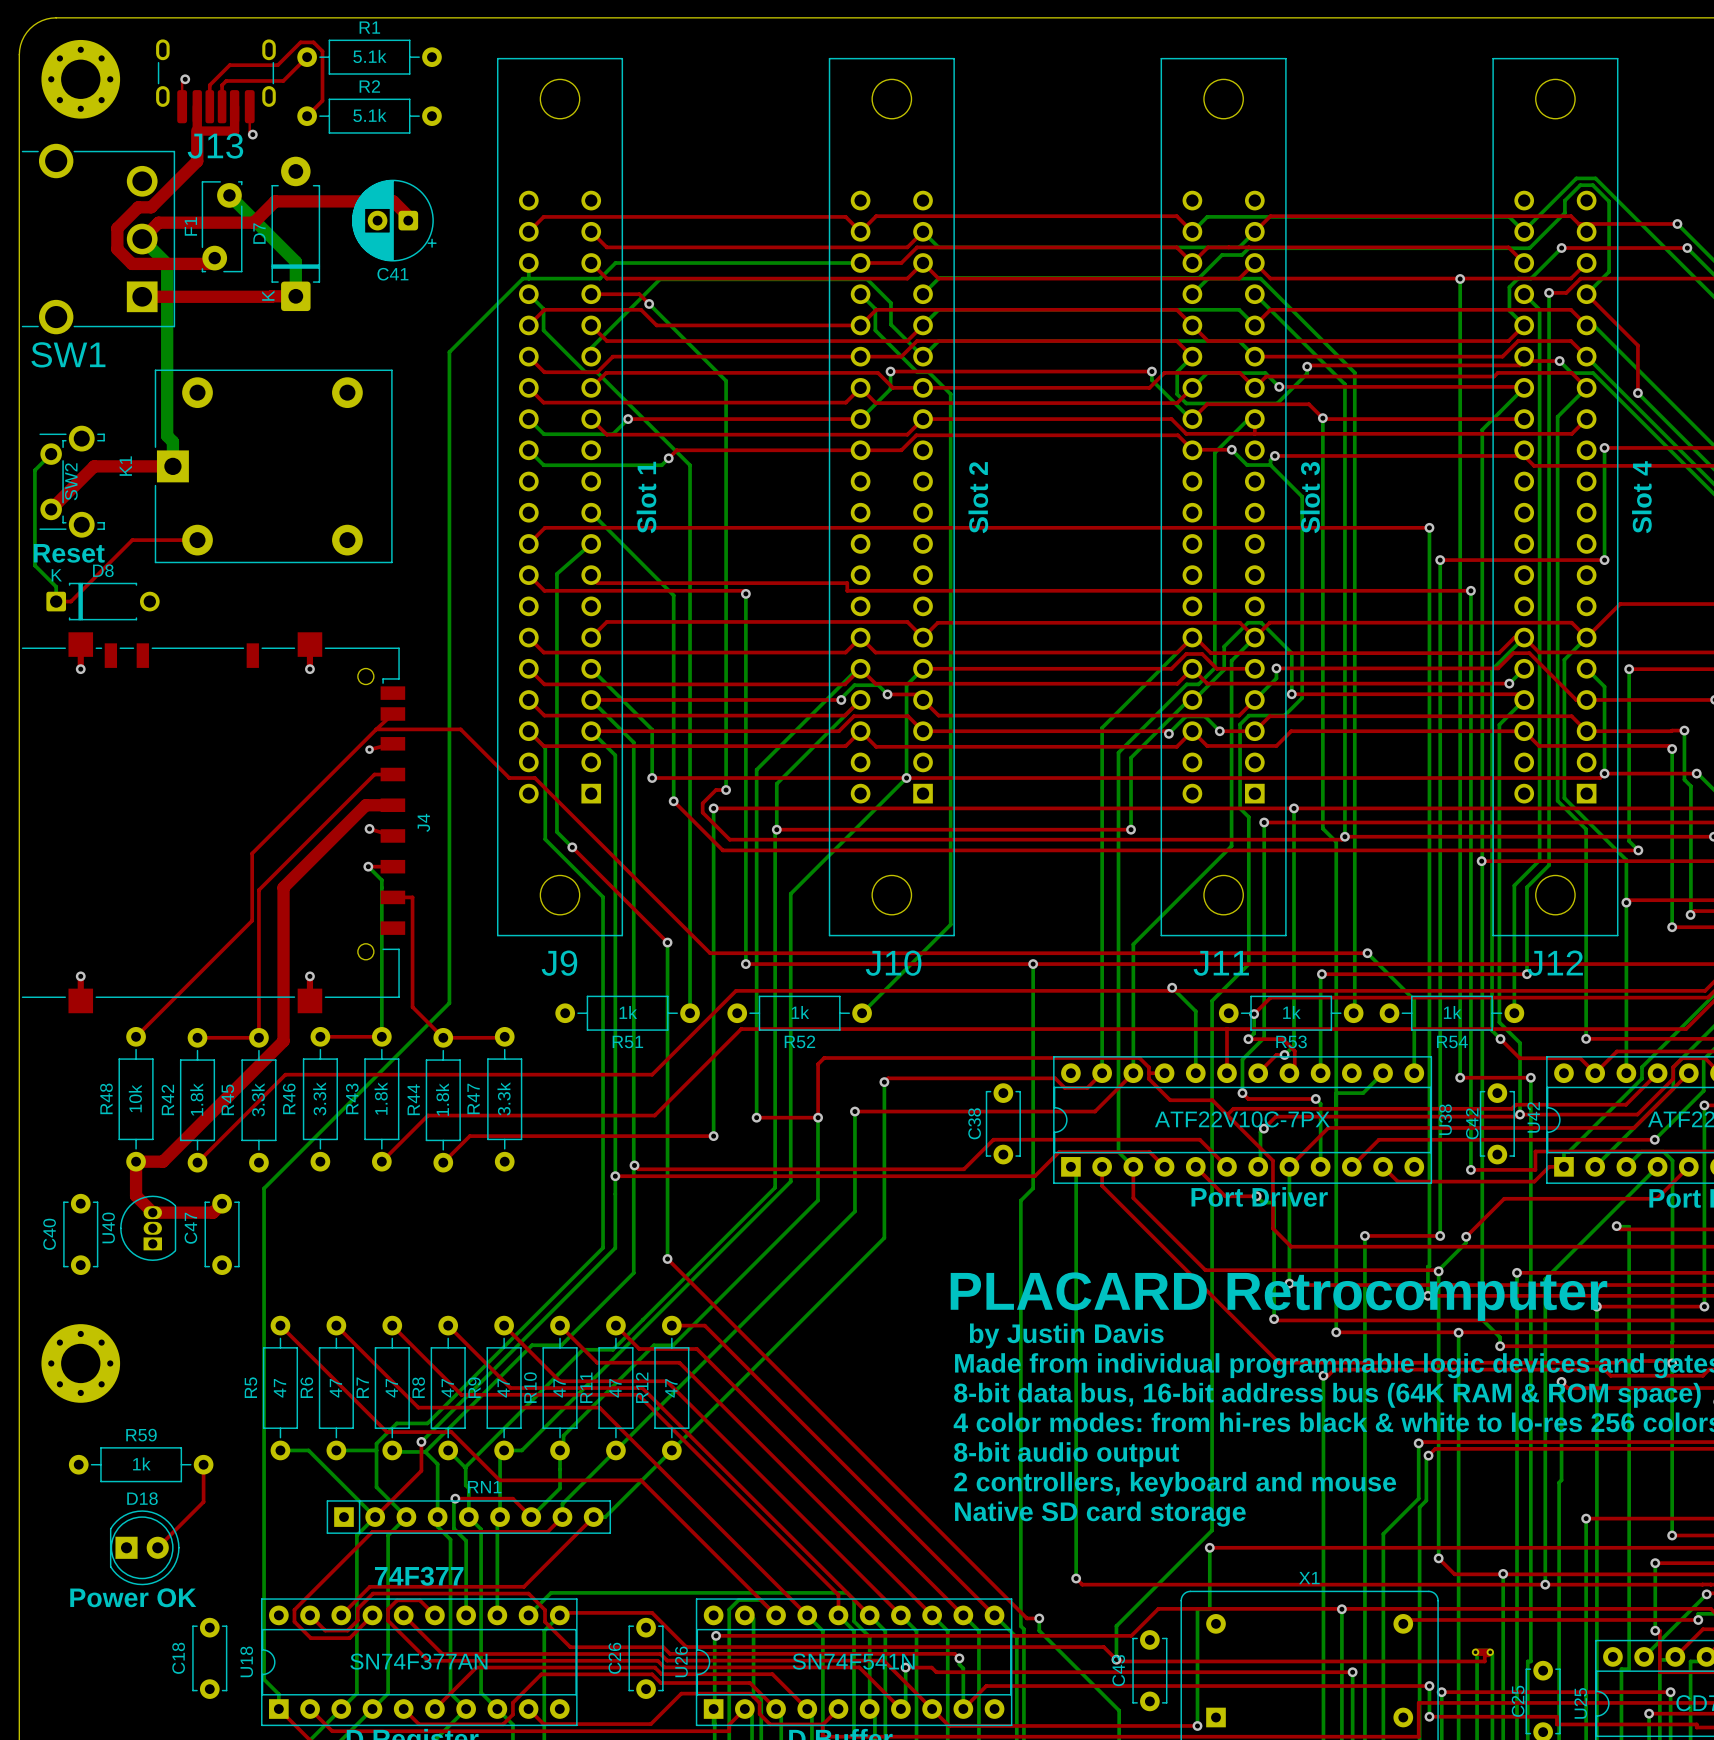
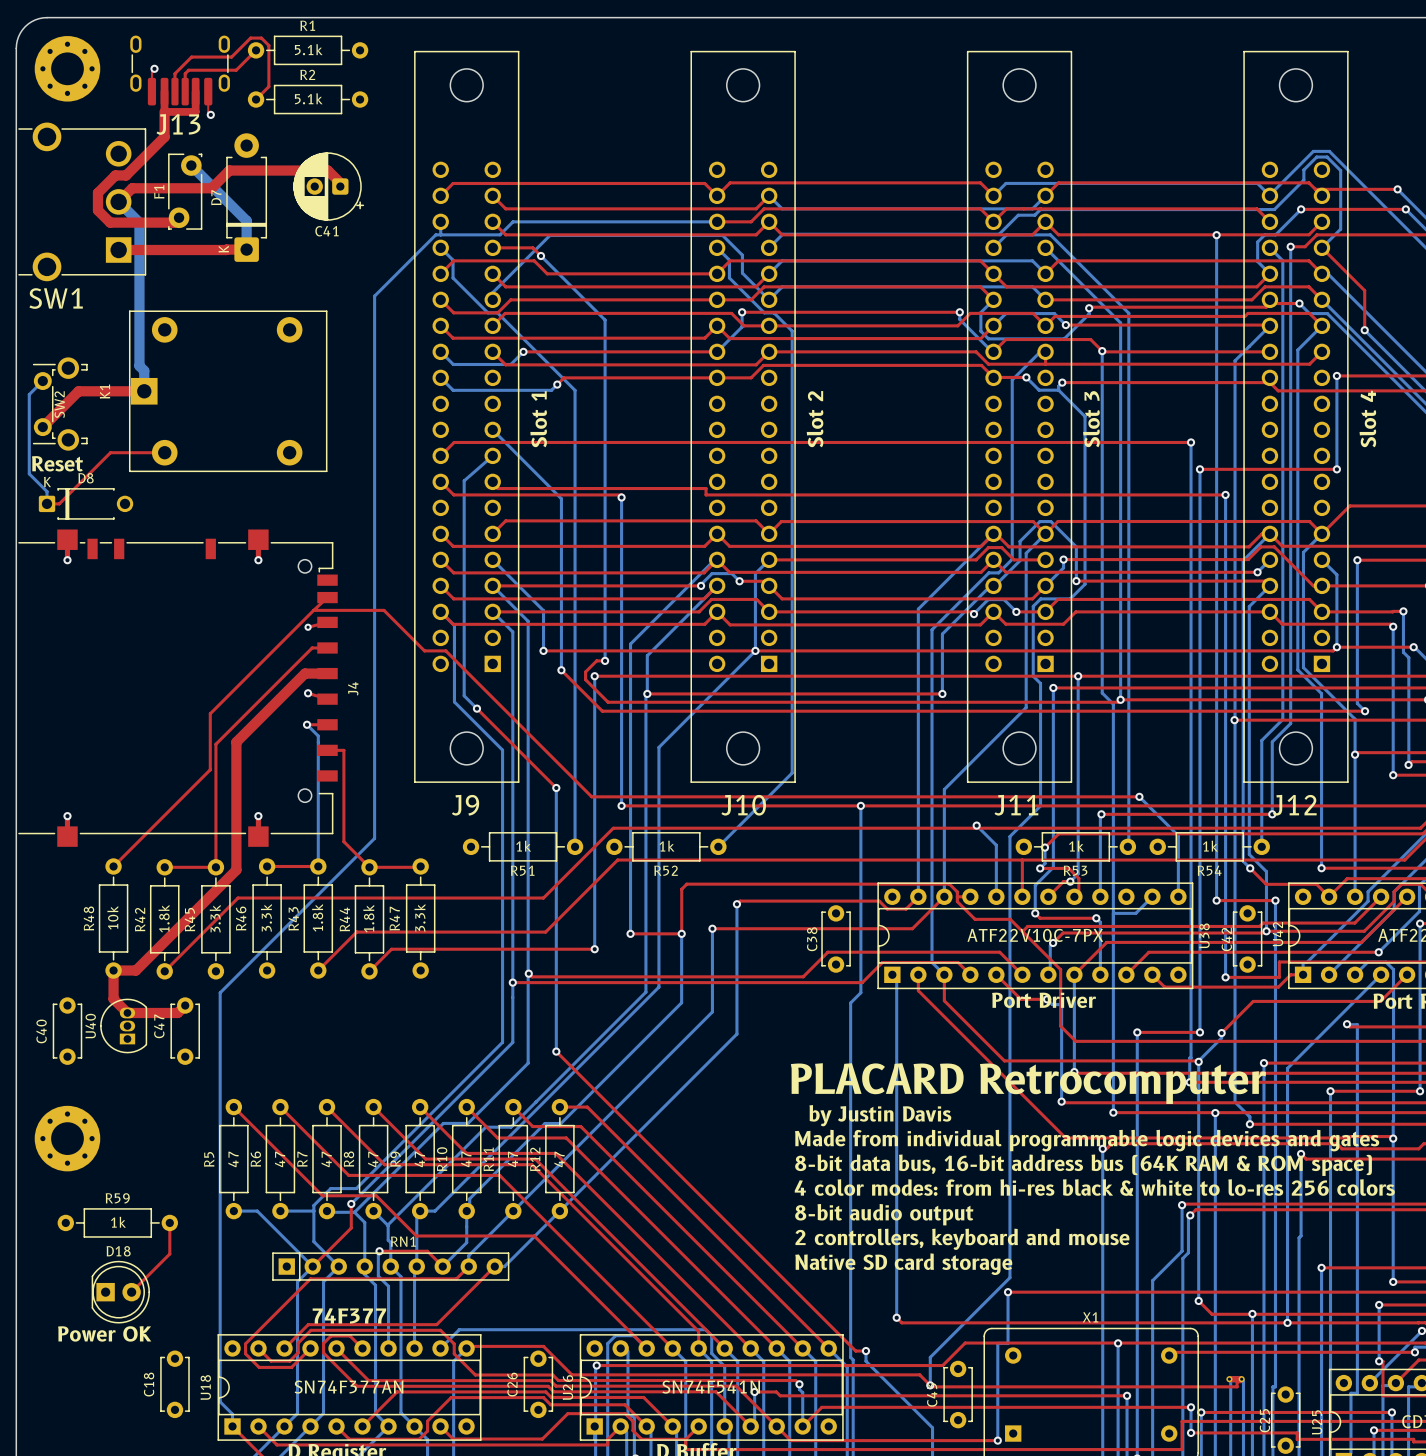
K1 footprint: [154, 369, 393, 564] -> [129, 310, 328, 472]

